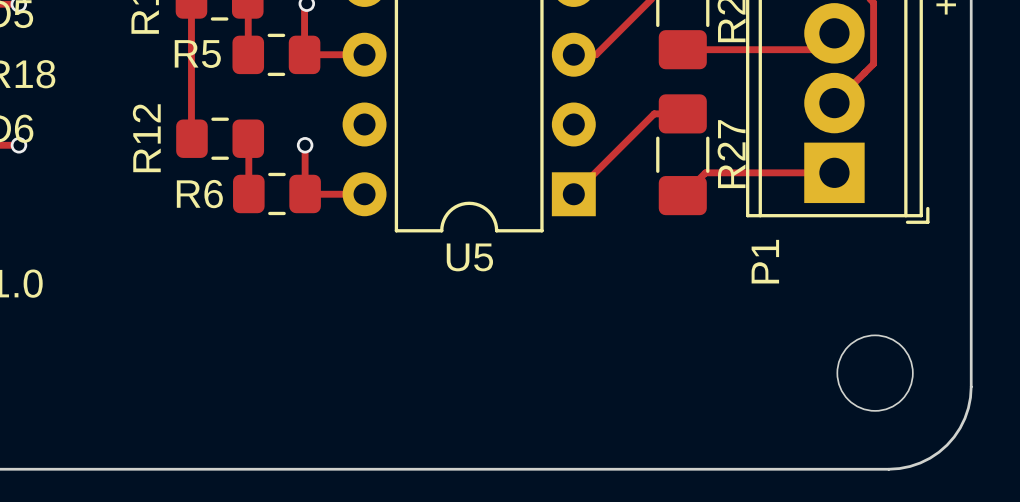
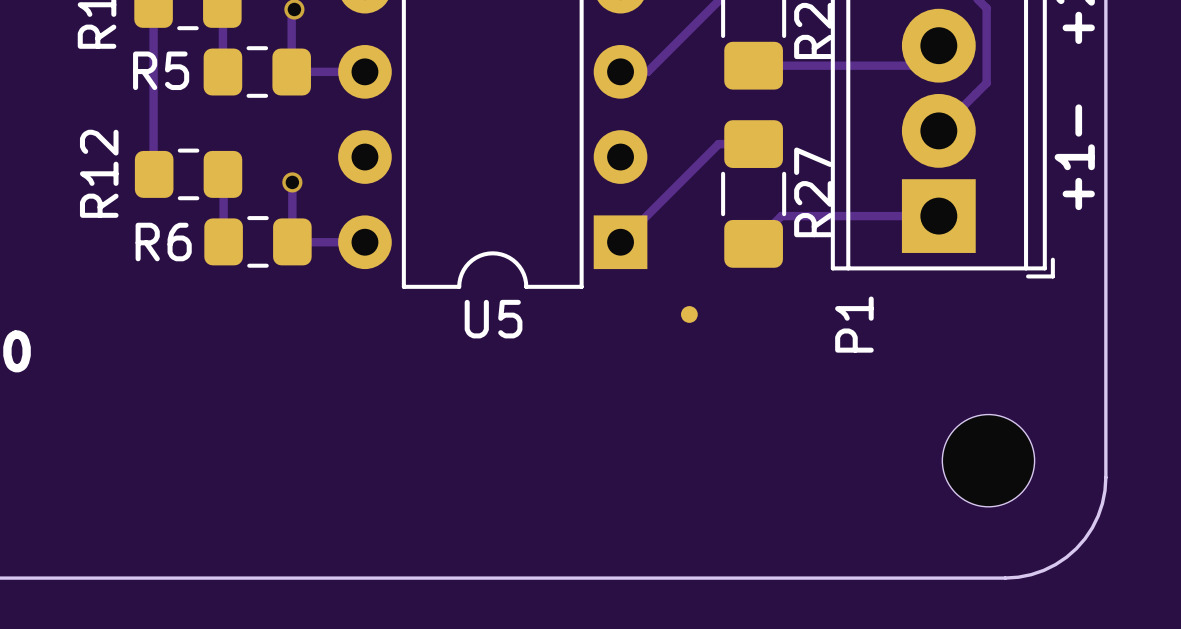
part: none -> (689, 314)

